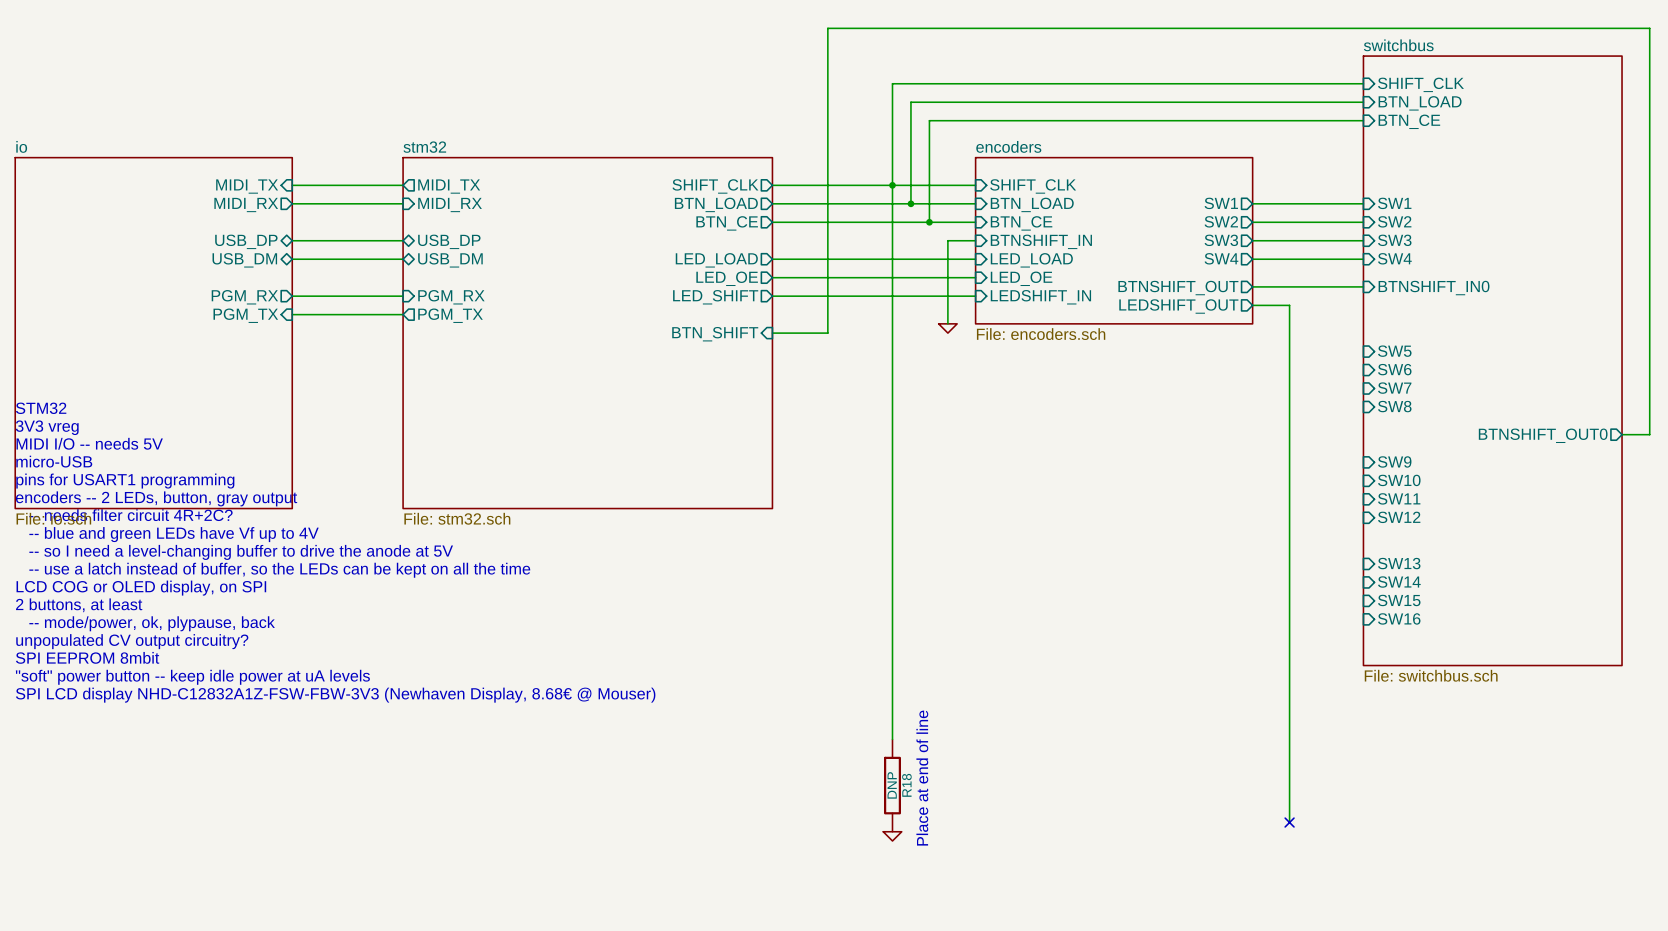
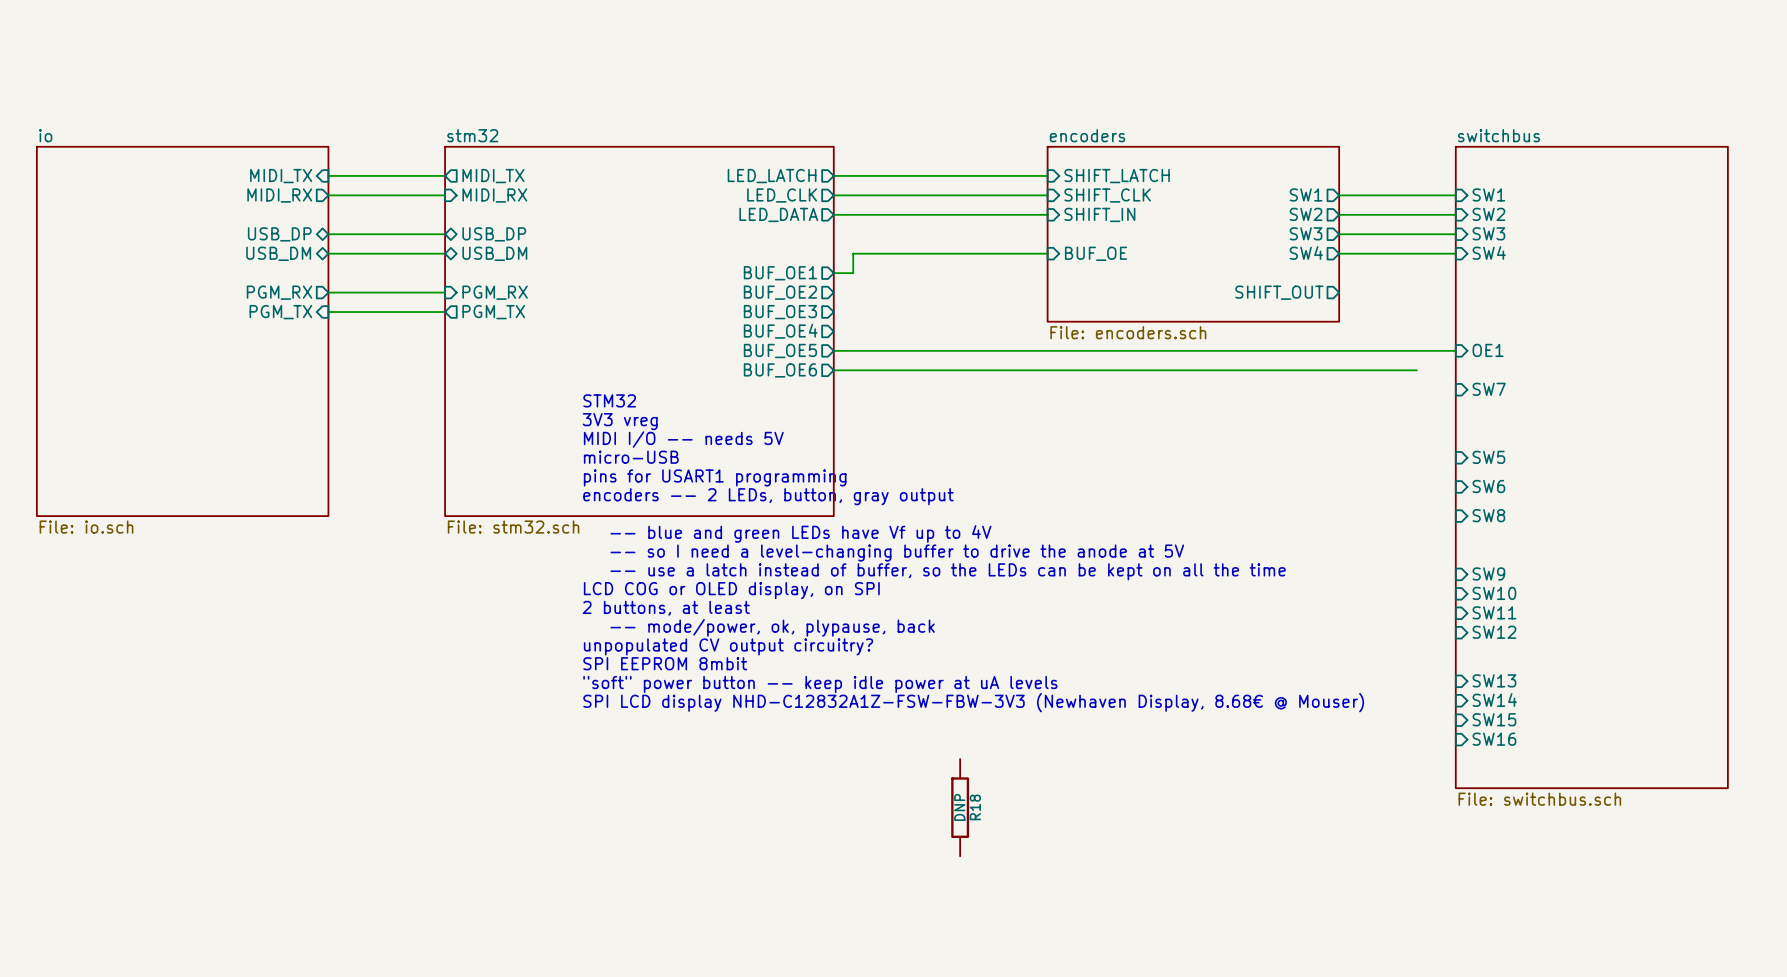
wire: (1363, 83) (892, 83) (892, 739) -> none
sheet pin: SHIFT_CLK (1420, 84) -> none
wire: (1363, 102) (910, 102) (910, 203) -> none
sheet pin: BTN_LOAD (1420, 103) -> none
wire: (1363, 120) (929, 120) (929, 222) -> none
sheet pin: BTN_CE (1409, 121) -> none
junction: (892, 185) -> none
sheet pin: SHIFT_CLK (715, 186) -> LED_LATCH (772, 176)
sheet pin: SHIFT_CLK (1033, 186) -> SHIFT_LATCH (1117, 176)
junction: (910, 203) -> none
sheet pin: BTN_LOAD (716, 204) -> LED_CLK (782, 195)
sheet pin: BTN_LOAD (1032, 204) -> SHIFT_CLK (1107, 195)
junction: (929, 222) -> none
sheet pin: BTN_CE (727, 223) -> LED_DATA (778, 214)
sheet pin: BTN_CE (1021, 223) -> SHIFT_IN (1099, 214)
wire: (975, 240) (947, 240) (947, 323) -> none
sheet pin: BTNSHIFT_IN (1041, 241) -> none
wire: (772, 259) (790, 259) -> (853, 273) (853, 253)
sheet pin: LED_LOAD (716, 260) -> none
sheet pin: LED_LOAD (1031, 260) -> BUF_OE (1095, 253)
wire: (790, 277) (975, 277) -> none
sheet pin: LED_OE (727, 278) -> BUF_OE1 (780, 273)
sheet pin: LED_OE (1021, 278) -> none
wire: (1252, 286) (1363, 286) -> none
sheet pin: BTNSHIFT_OUT (1178, 288) -> none
sheet pin: BTNSHIFT_IN0 (1434, 288) -> none
wire: (772, 296) (975, 296) -> none
sheet pin: LED_SHIFT (715, 297) -> BUF_OE2 (780, 292)
sheet pin: LEDSHIFT_IN (1040, 297) -> none
sheet pin: none -> SHIFT_OUT (1279, 292)
wire: (1252, 305) (1289, 305) (1289, 822) -> none
sheet pin: LEDSHIFT_OUT (1178, 306) -> none
sheet pin: none -> BUF_OE3 (780, 312)
power symbol: (947, 328) -> none
wire: (772, 333) (827, 333) (827, 28) (1649, 28) (1649, 434) (1622, 434) -> none
sheet pin shape: input (715, 334) -> output (780, 331)
sheet pin: BTN_SHIFT (715, 334) -> BUF_OE4 (780, 331)
wire: none -> (833, 350) (1455, 350)
sheet pin: SW5 (1394, 351) -> OE1 (1488, 350)
sheet pin: none -> BUF_OE5 (780, 351)
sheet switchbus position: (1492, 360) -> (1591, 467)
sheet pin: SW6 (1394, 369) -> none
wire: none -> (833, 370) (1416, 370)
sheet pin: none -> BUF_OE6 (780, 370)
text: none -> STM32 (609, 400)
sheet pin position: SW8 (1394, 406) -> SW8 (1488, 515)
text: STM32 (41, 408) -> none
text: none -> 3V3 vreg (620, 421)
text: 3V3 vreg (47, 427) -> none
text: none -> MIDI I/O -- needs 5V (683, 439)
sheet pin: BTNSHIFT_OUT0 (1543, 435) -> none
text: MIDI I/O -- needs 5V (89, 443) -> none
text: none -> micro-USB (631, 457)
text: micro-USB (54, 461) -> none
sheet pin: SW9 (1394, 461) -> SW5 (1488, 457)
text: none -> pins for USART1 programming (715, 477)
sheet pin: SW10 (1399, 480) -> SW6 (1488, 486)
text: pins for USART1 programming (125, 481) -> none
text: none -> encoders -- 2 LEDs, button, gray output (768, 496)
text: encoders -- 2 LEDs, button, gray output (156, 498) -> none
sheet pin: SW11 (1399, 498) -> none
text: -- needs filter circuit 4R+2C? (130, 515) -> none
sheet pin: SW12 (1399, 517) -> none
text: none -> -- blue and green LEDs have Vf up to 4V (800, 533)
text: -- blue and green LEDs have Vf up to 4V (174, 534) -> none
text: none -> -- so I need a level-changing buffer to drive the anode at 5V (897, 553)
text: -- so I need a level-changing buffer to drive the anode at 5V (241, 552) -> none
text: none -> -- use a latch instead of buffer, so the LEDs can be kept on all the time (948, 571)
sheet pin: SW13 (1399, 563) -> SW9 (1488, 573)
text: -- use a latch instead of buffer, so the LEDs can be kept on all the time (279, 570) -> none
text: none -> LCD COG or OLED display, on SPI (731, 590)
sheet pin: SW14 (1399, 582) -> SW10 (1494, 593)
text: LCD COG or OLED display, on SPI (141, 588) -> none
text: none -> 2 buttons, at least (666, 608)
sheet pin: SW15 (1399, 600) -> SW11 (1494, 612)
text: 2 buttons, at least (79, 605) -> none
text: none -> -- mode/power, ok, plypause, back (772, 627)
sheet pin: SW16 (1399, 618) -> SW12 (1494, 632)
text: -- mode/power, ok, plypause, back (152, 623) -> none
text: none -> unpopulated CV output circuitry? (728, 646)
text: unpopulated CV output circuitry? (132, 641) -> none
text: none -> SPI EEPROM 8mbit (665, 663)
text: SPI EEPROM 8mbit (87, 657) -> none
sheet pin: none -> SW13 (1494, 680)
text: none -> "soft" power button -- keep idle power at uA levels (820, 684)
text: "soft" power button -- keep idle power at uA levels (192, 677) -> none
sheet pin: none -> SW14 (1494, 700)
text: none -> SPI LCD display NHD-C12832A1Z-FSW-FBW-3V3 (Newhaven Display, 8.68€ @ Mouser) (973, 702)
text: SPI LCD display NHD-C12832A1Z-FSW-FBW-3V3 (Newhaven Display, 8.68€ @ Mouser) (335, 695) -> none
sheet pin: none -> SW15 (1494, 719)
sheet pin: none -> SW16 (1494, 739)
text: Place at end of line (922, 778) -> none
no-connect mark: (1289, 822) -> none
power symbol: (892, 836) -> none

